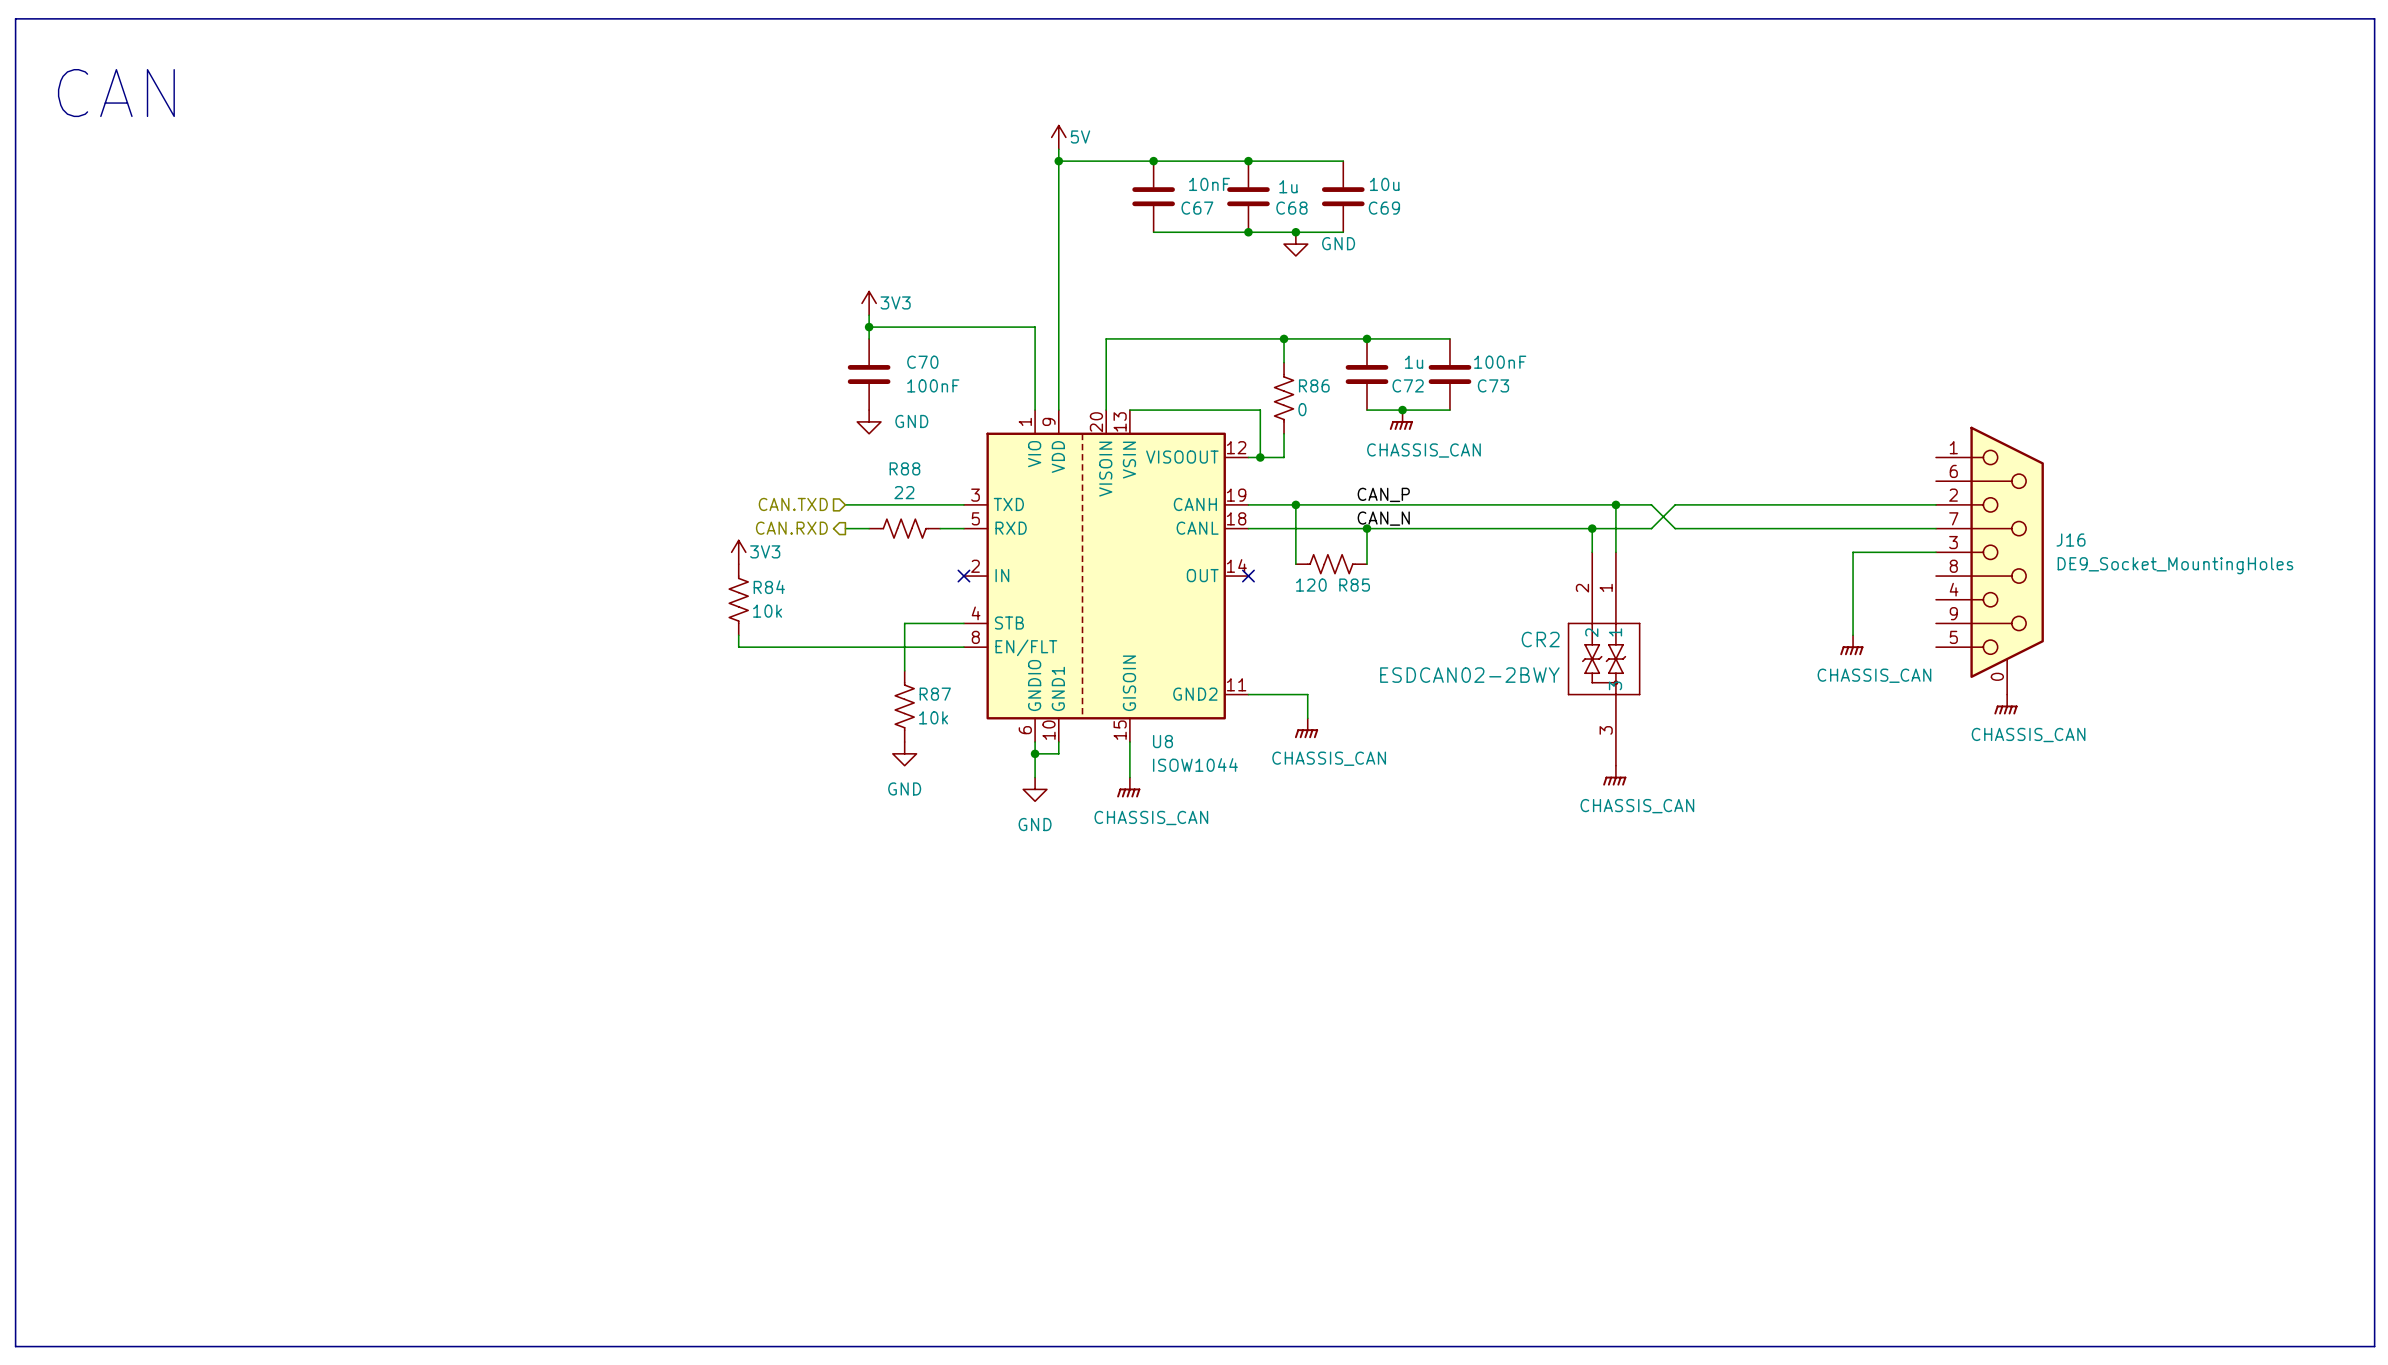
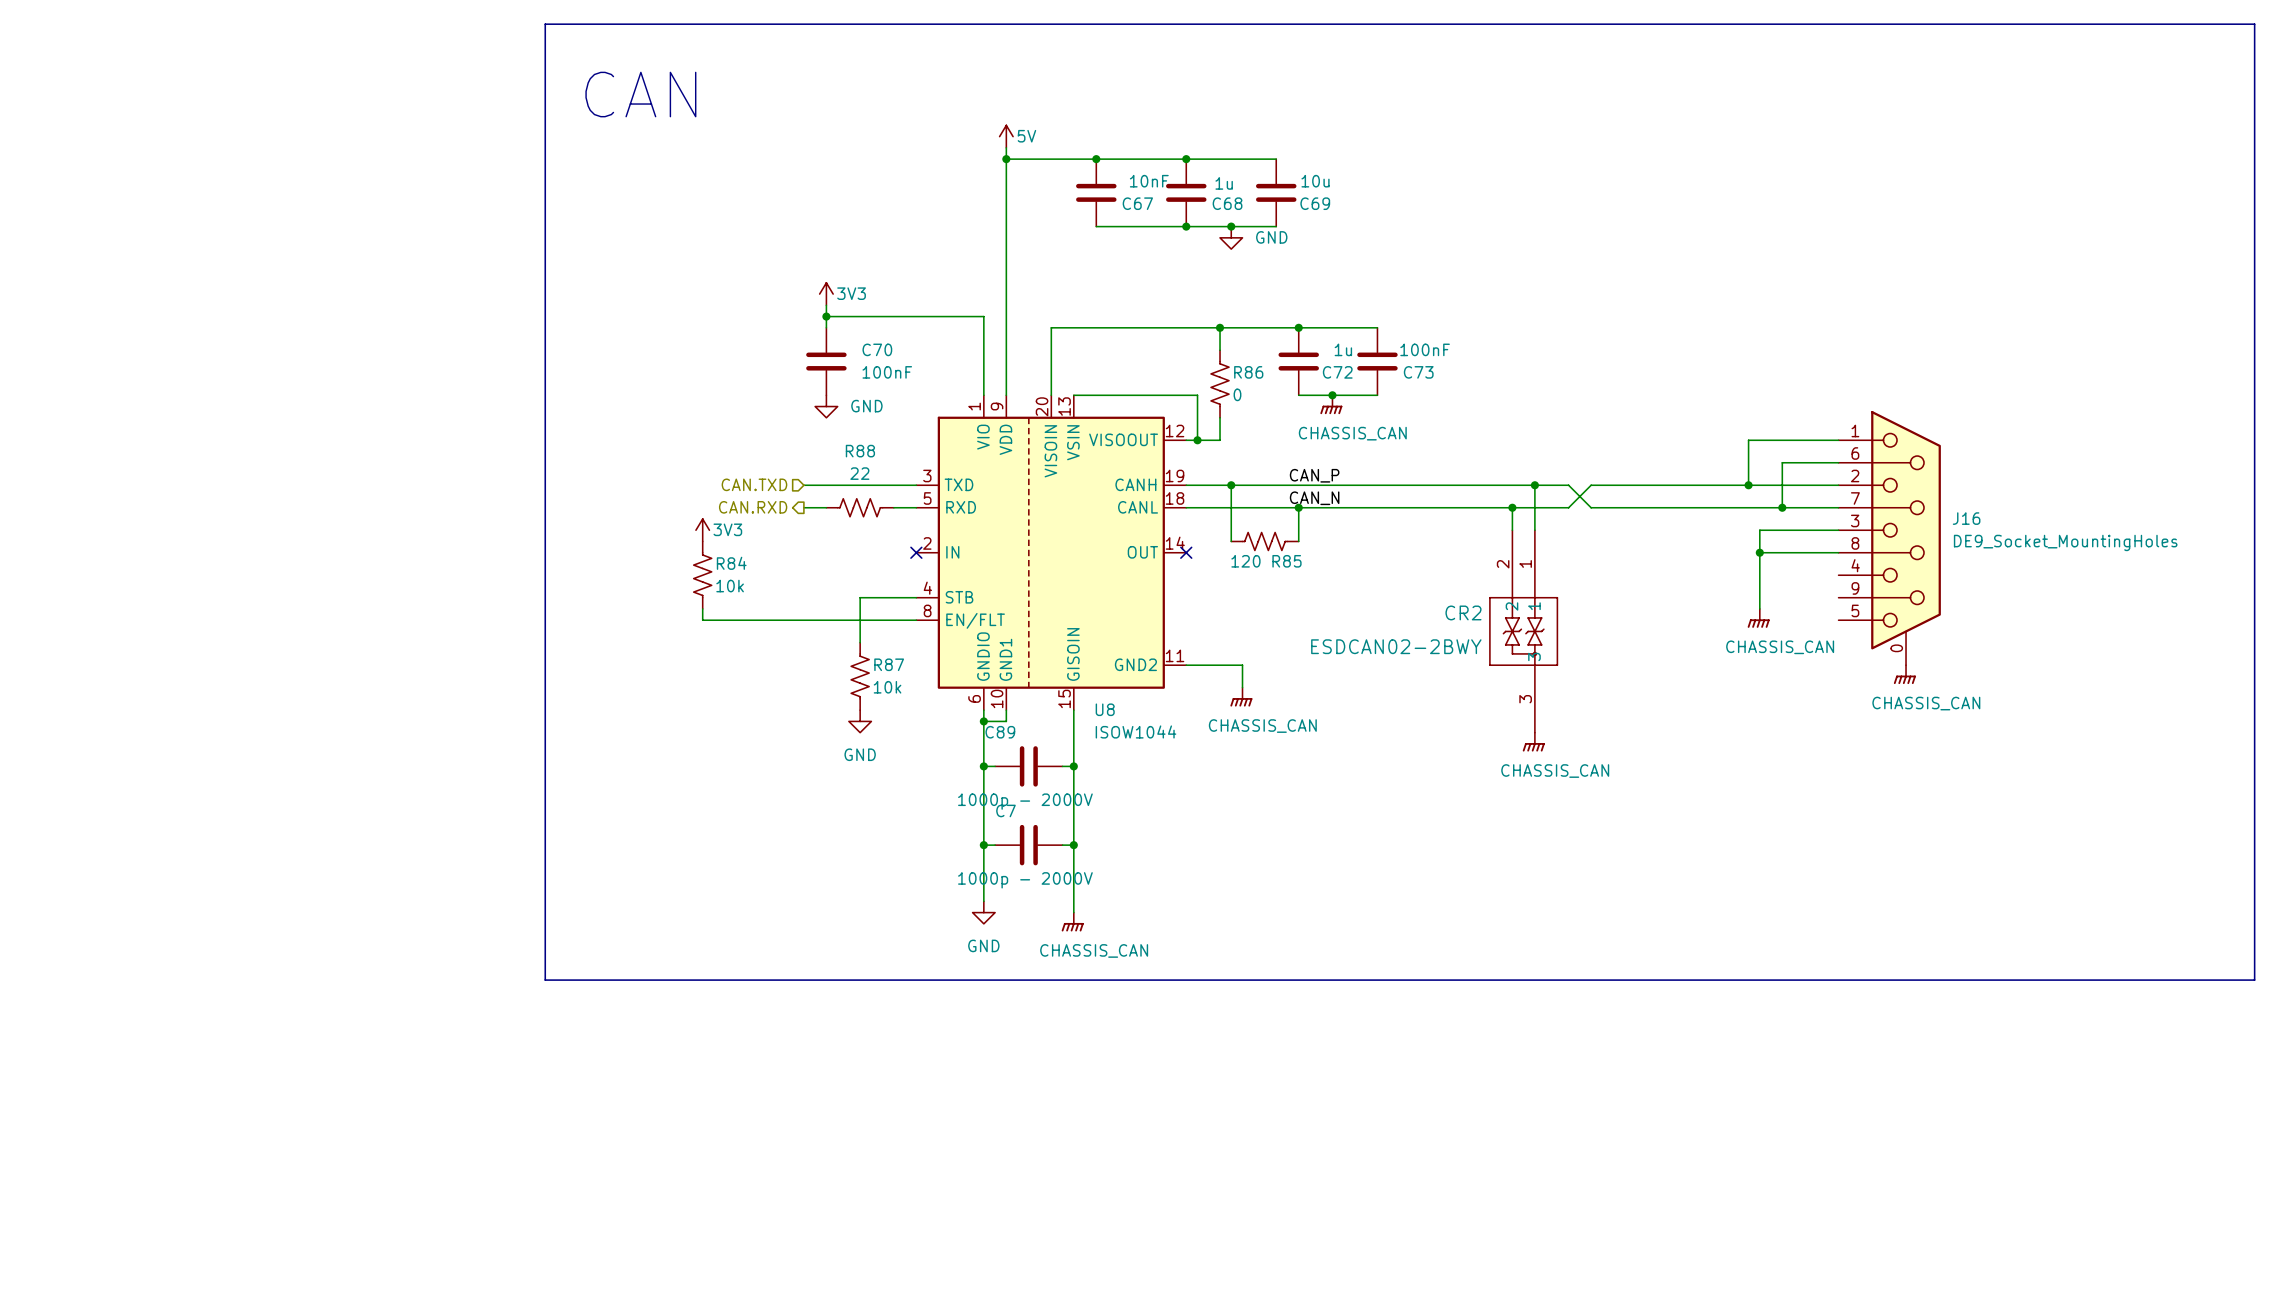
line: (572, 18) (15, 18) (15, 1346) (2374, 1346) (2374, 1026) -> (545, 24) (545, 980) (2254, 980)
text: CAN (116, 93) -> none
text: none -> CAN (640, 94)
wire: none -> (1838, 440) (1748, 440) (1748, 485)
wire: none -> (1838, 462) (1782, 462) (1782, 507)
junction: none -> (1748, 485)
junction: none -> (1782, 507)
wire: none -> (1759, 552) (1838, 552)
junction: none -> (1759, 552)
wire: none -> (983, 743) (983, 901)
wire: none -> (1073, 743) (1073, 912)
power symbol position: CHASSIS_CAN (1128, 787) -> CHASSIS_CAN (1072, 922)
power symbol position: GND (1035, 789) -> GND (983, 912)
wire: none -> (983, 766) (995, 766)
junction: none -> (983, 766)
C89: none -> 1000p - 2000V (1028, 766)
wire: none -> (1062, 766) (1073, 766)
junction: none -> (1073, 766)
wire: none -> (983, 845) (995, 845)
junction: none -> (983, 845)
C7: none -> 1000p - 2000V (1028, 845)
wire: none -> (1062, 845) (1073, 845)
junction: none -> (1073, 845)

